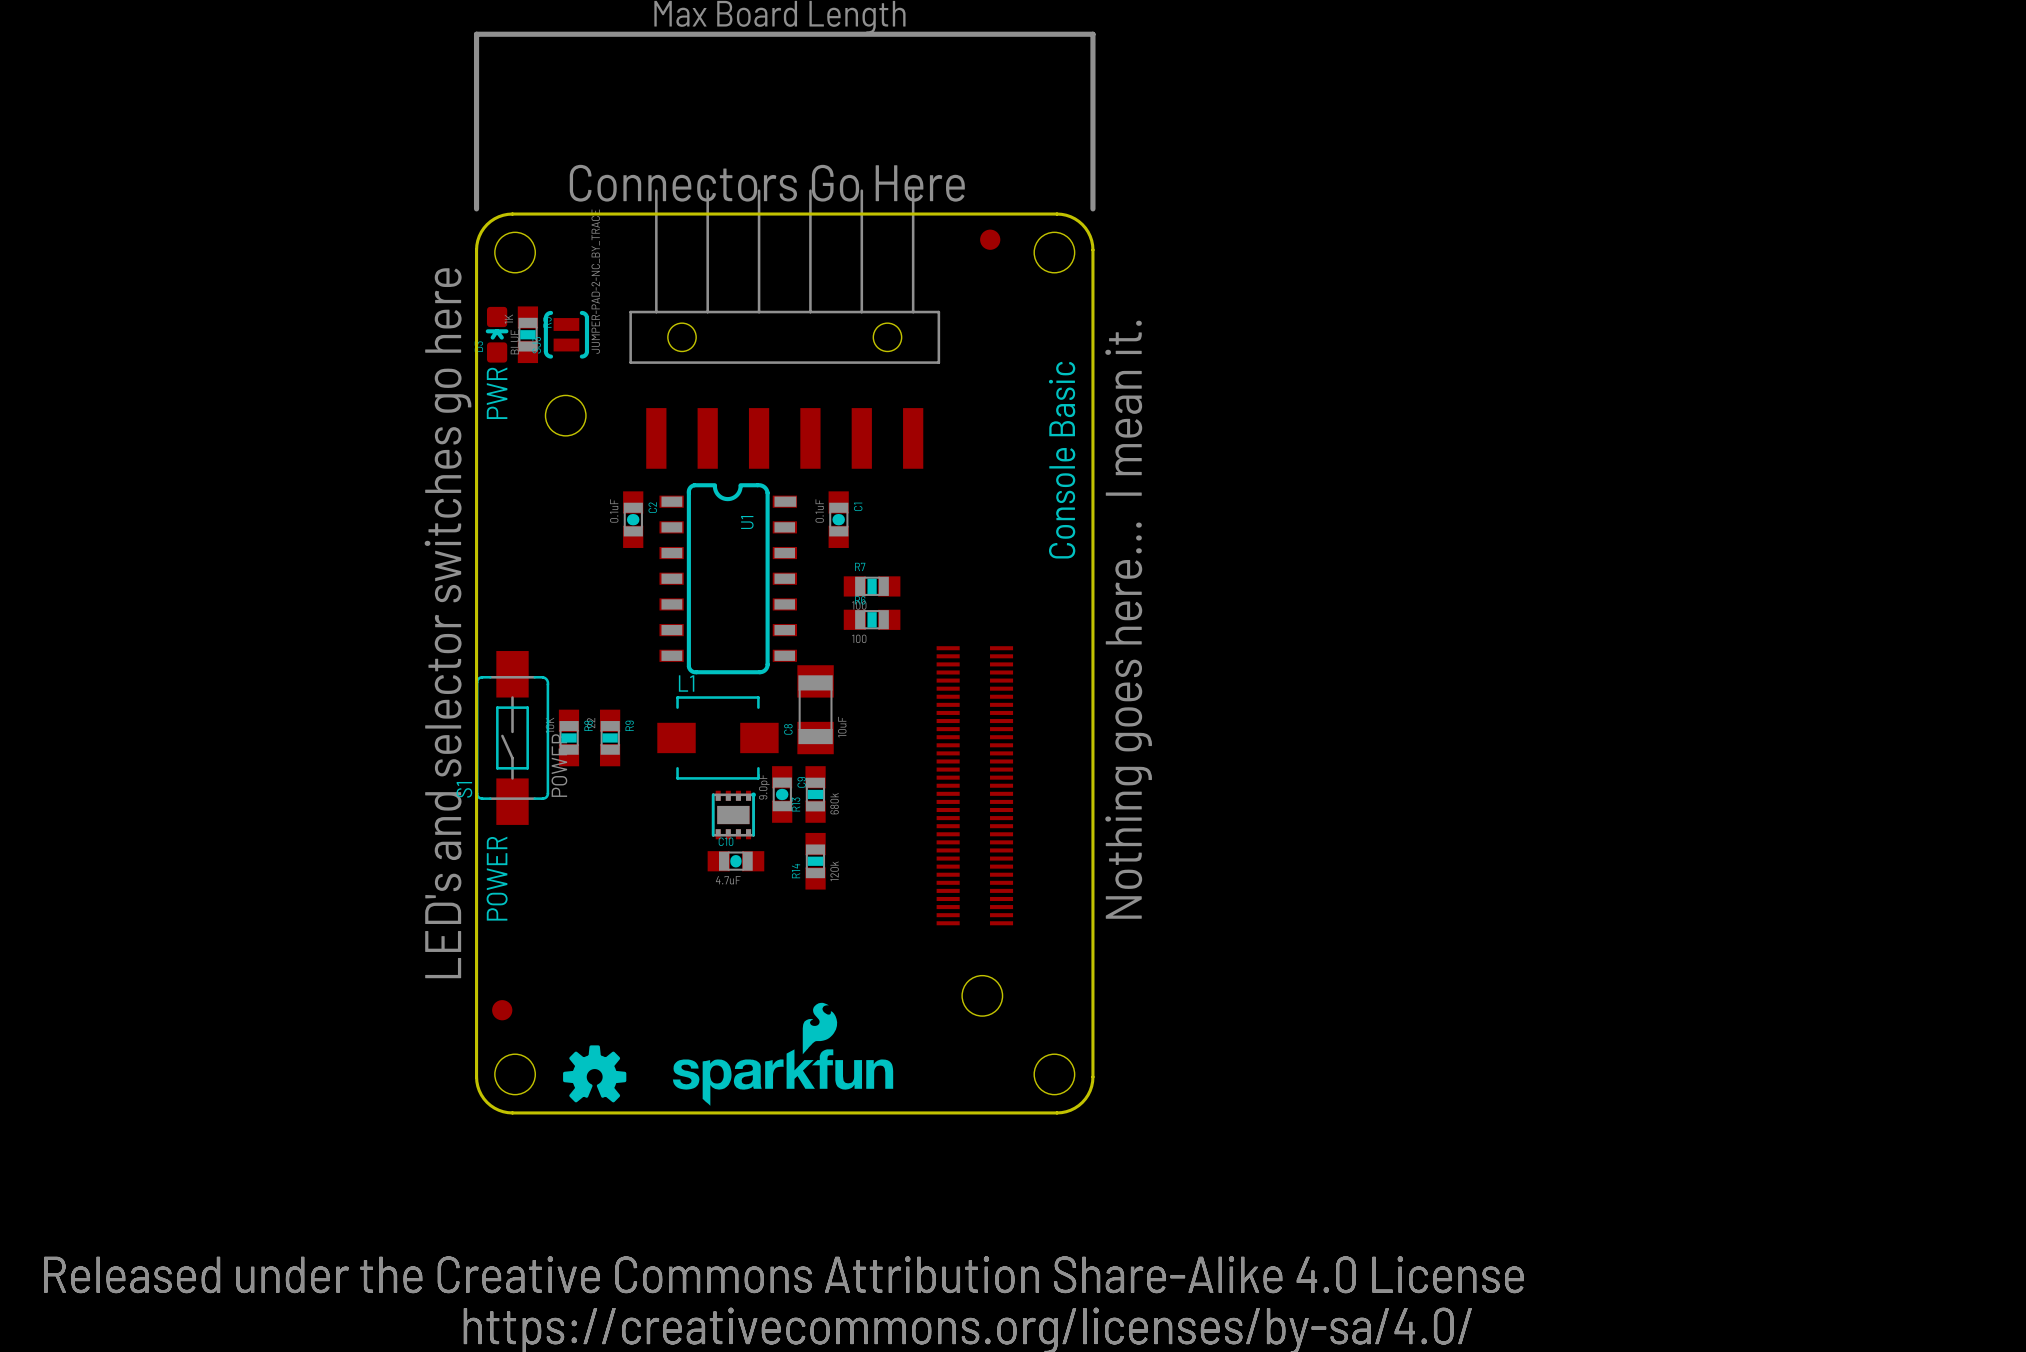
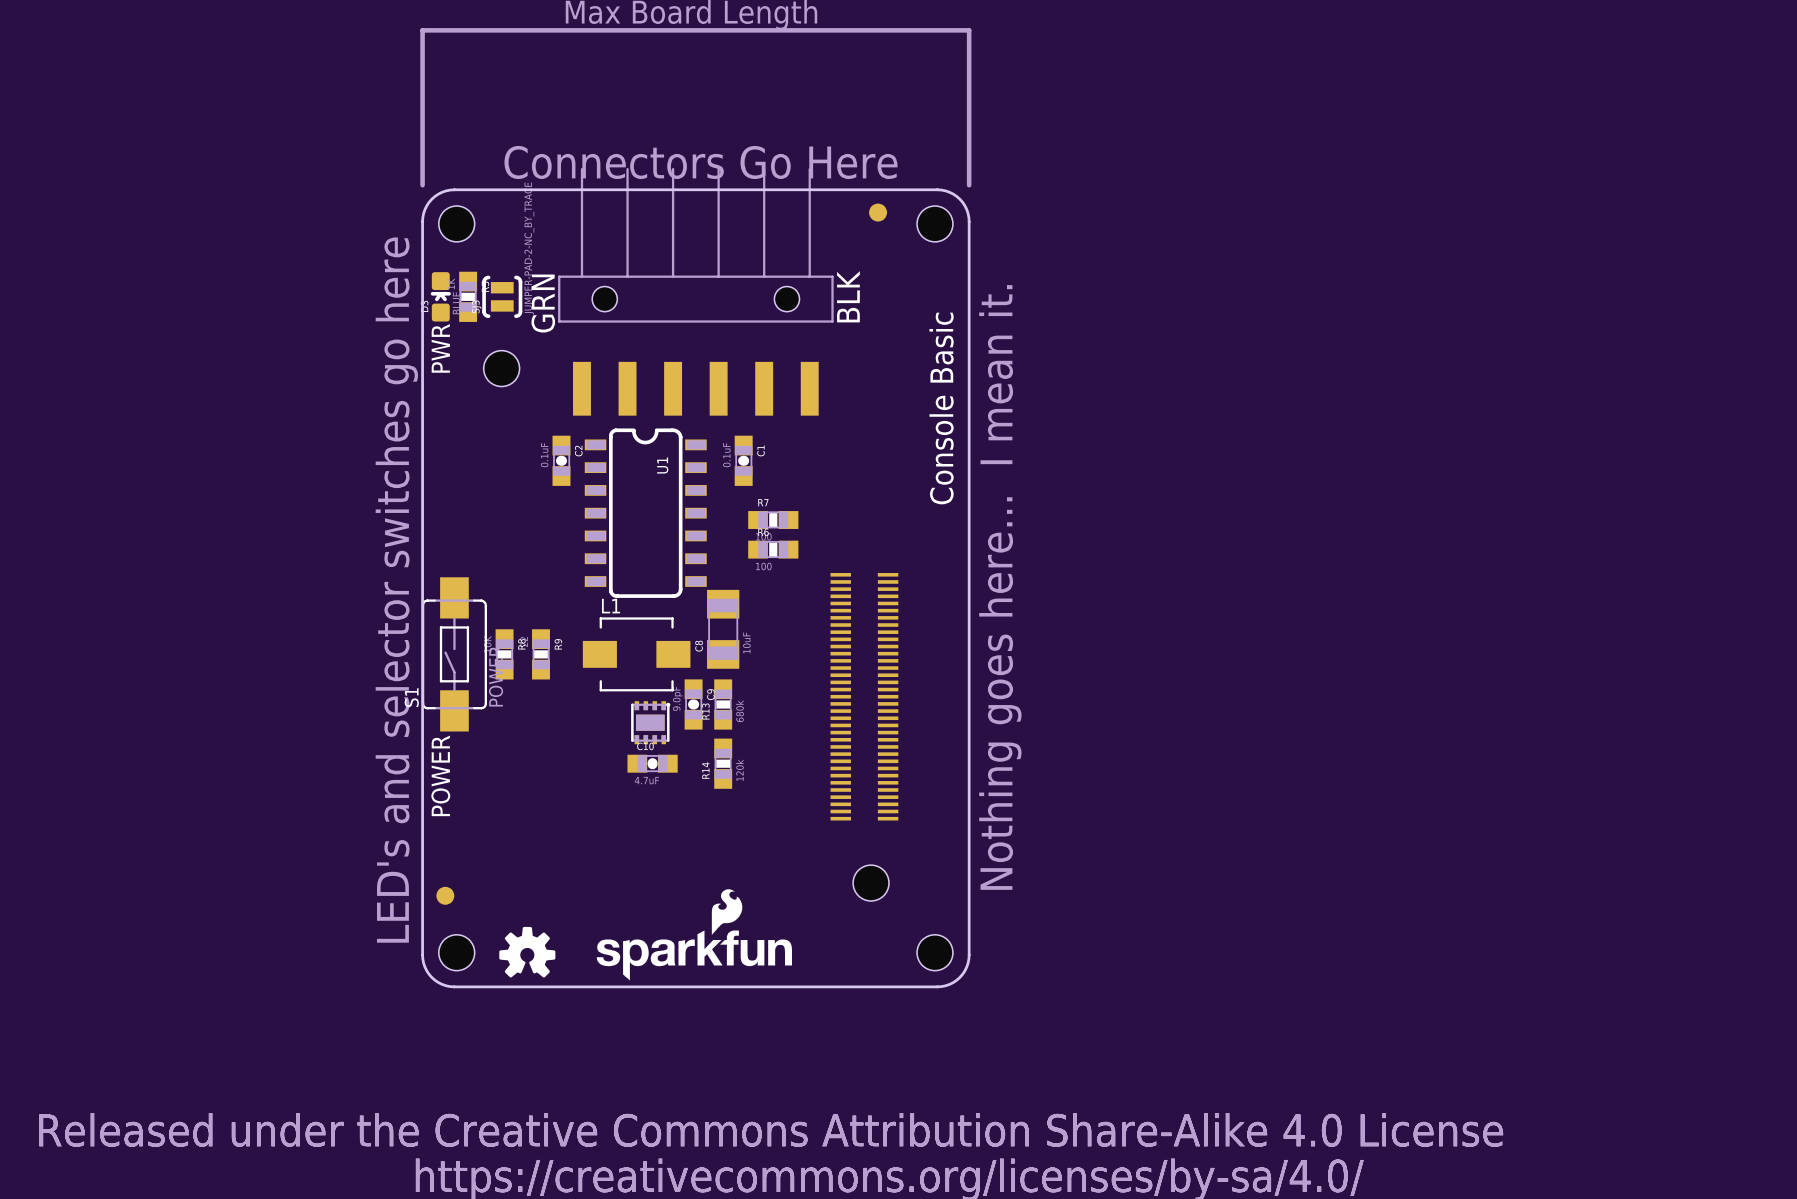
text: none -> BLK (848, 296)
text: none -> GRN (543, 303)

